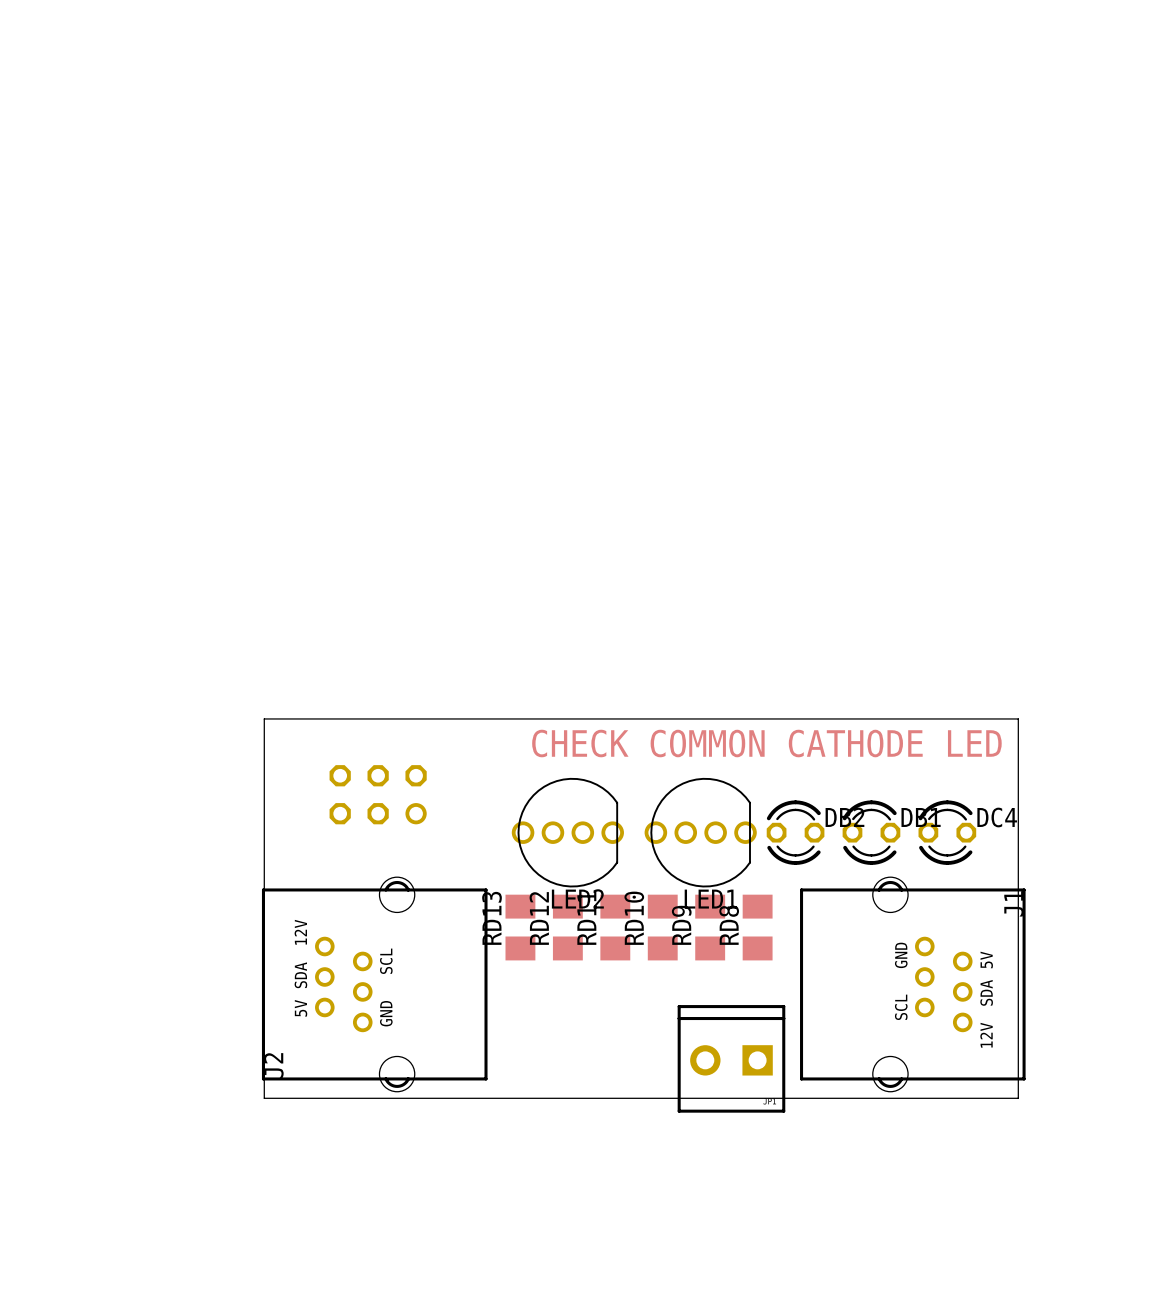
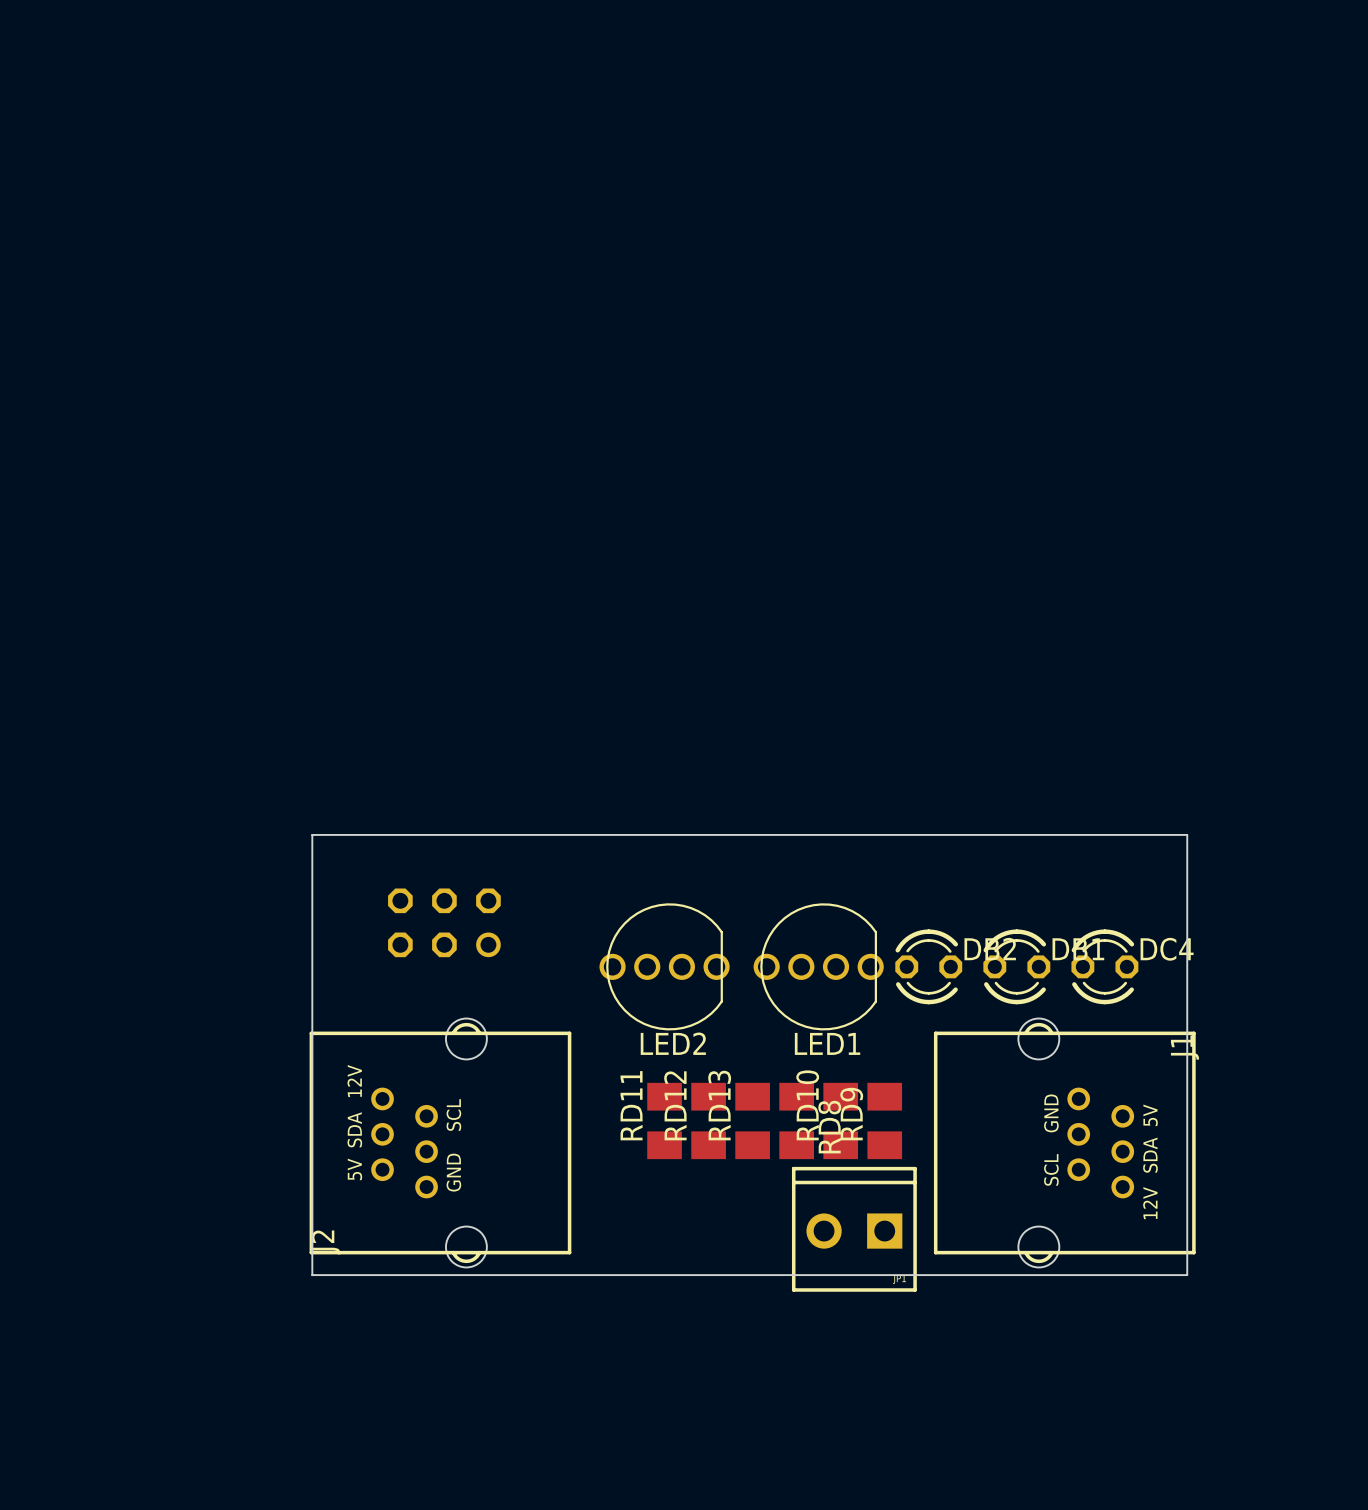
text: CHECK COMMON CATHODE LED (766, 743) -> none
RD8 name position: RD8 (729, 925) -> RD8 (829, 1127)
RD13 position: (520, 927) -> (752, 1120)
RD12 position: (567, 927) -> (708, 1120)
RD11 position: (615, 927) -> (664, 1120)
RD10 position: (662, 927) -> (840, 1120)
RD9 position: (710, 927) -> (884, 1120)
RD8 position: (757, 927) -> (796, 1120)

